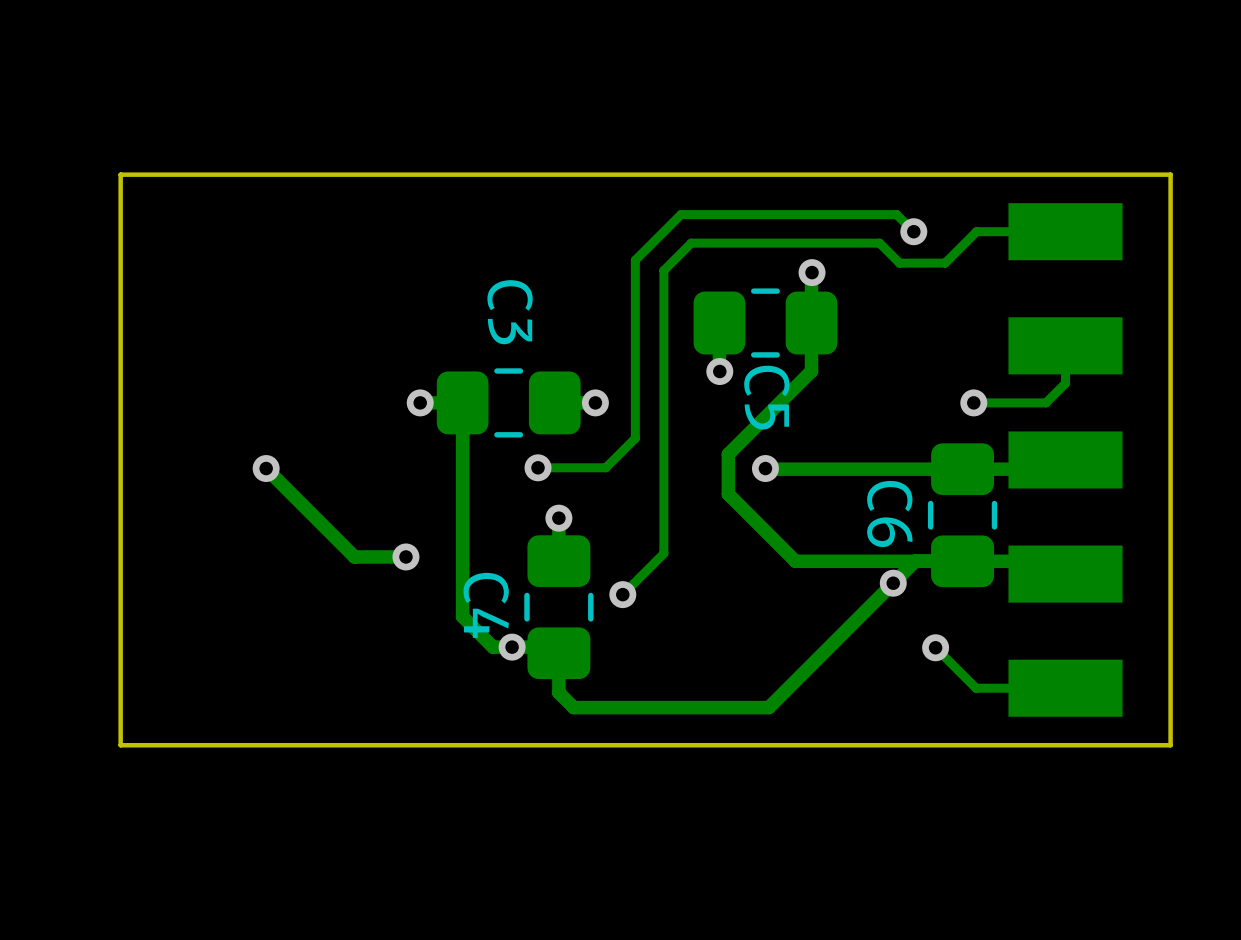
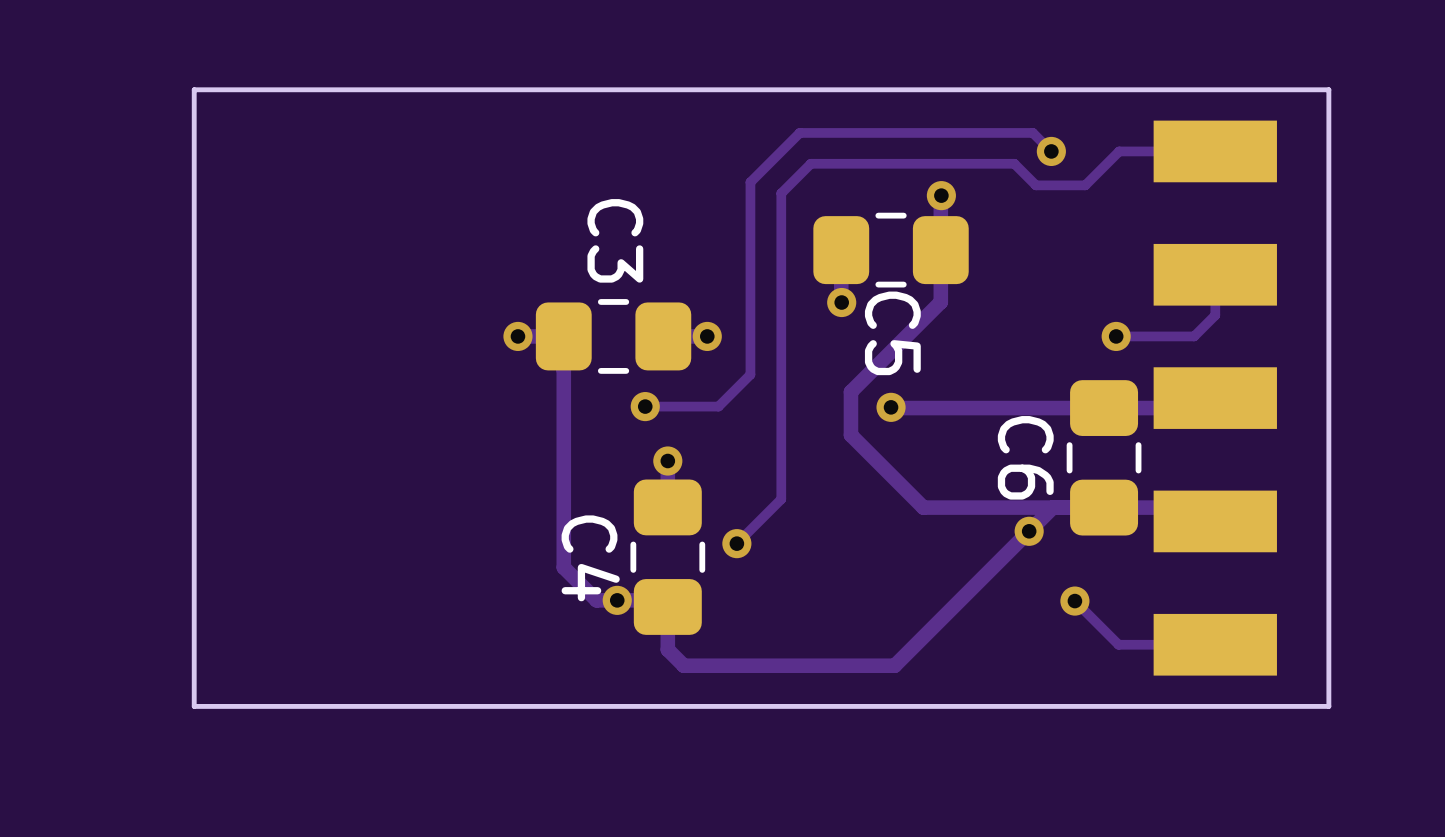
track: (266, 468) (354, 556) (405, 556) -> none
via: (266, 468) -> none
via: (405, 556) -> none

